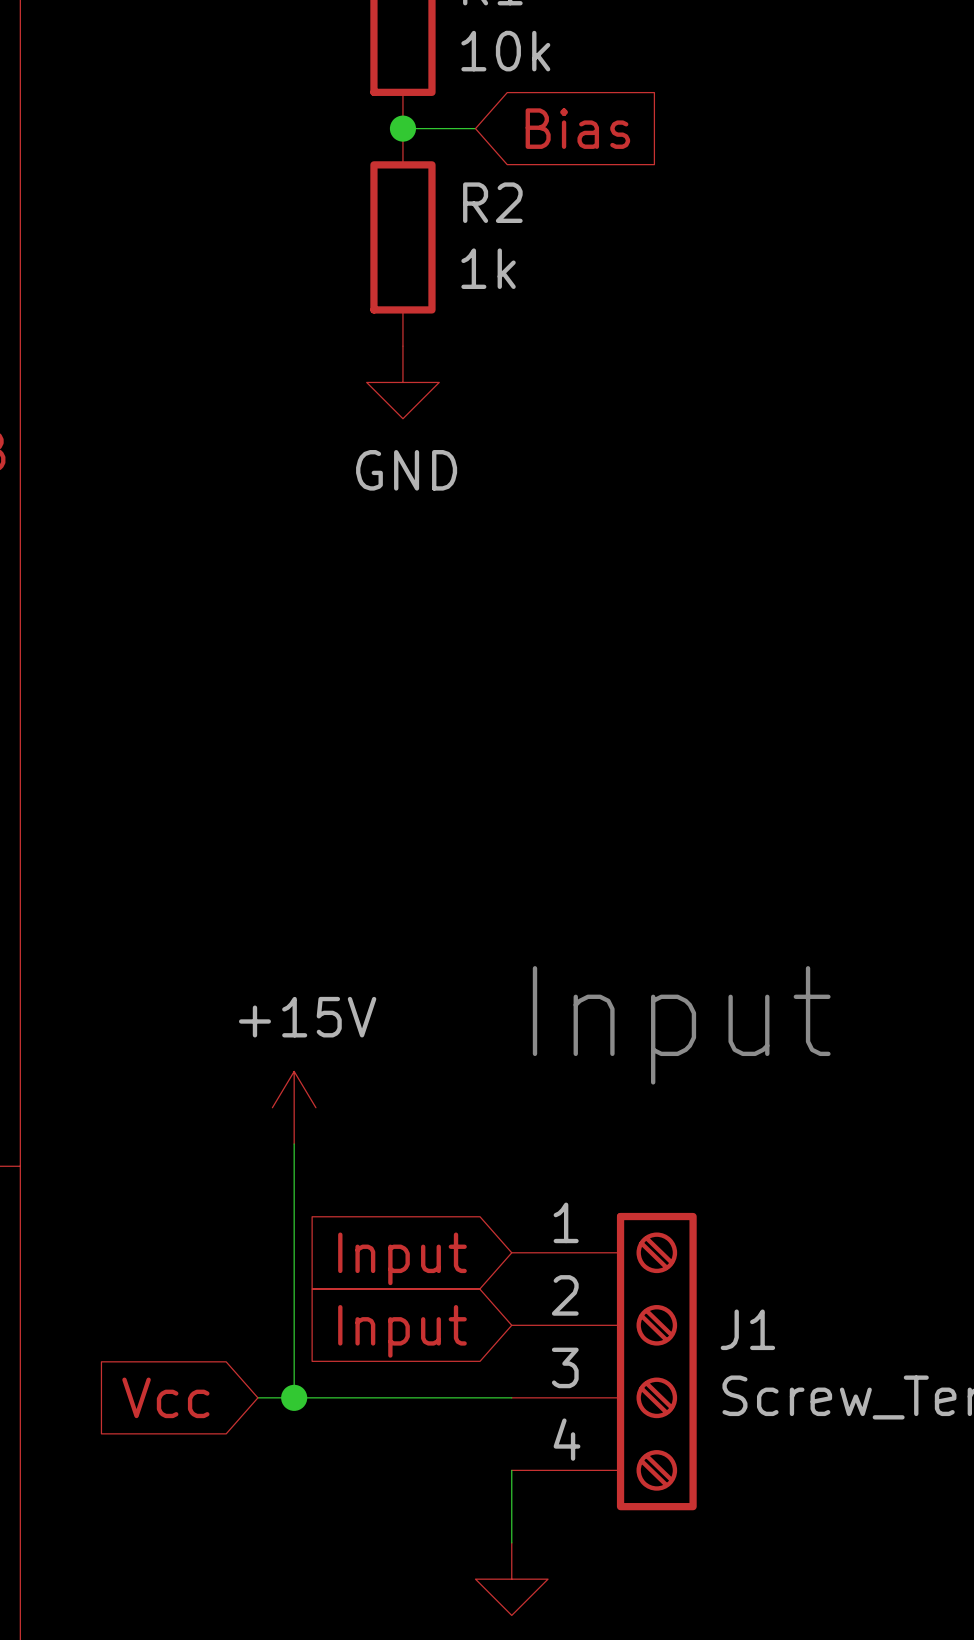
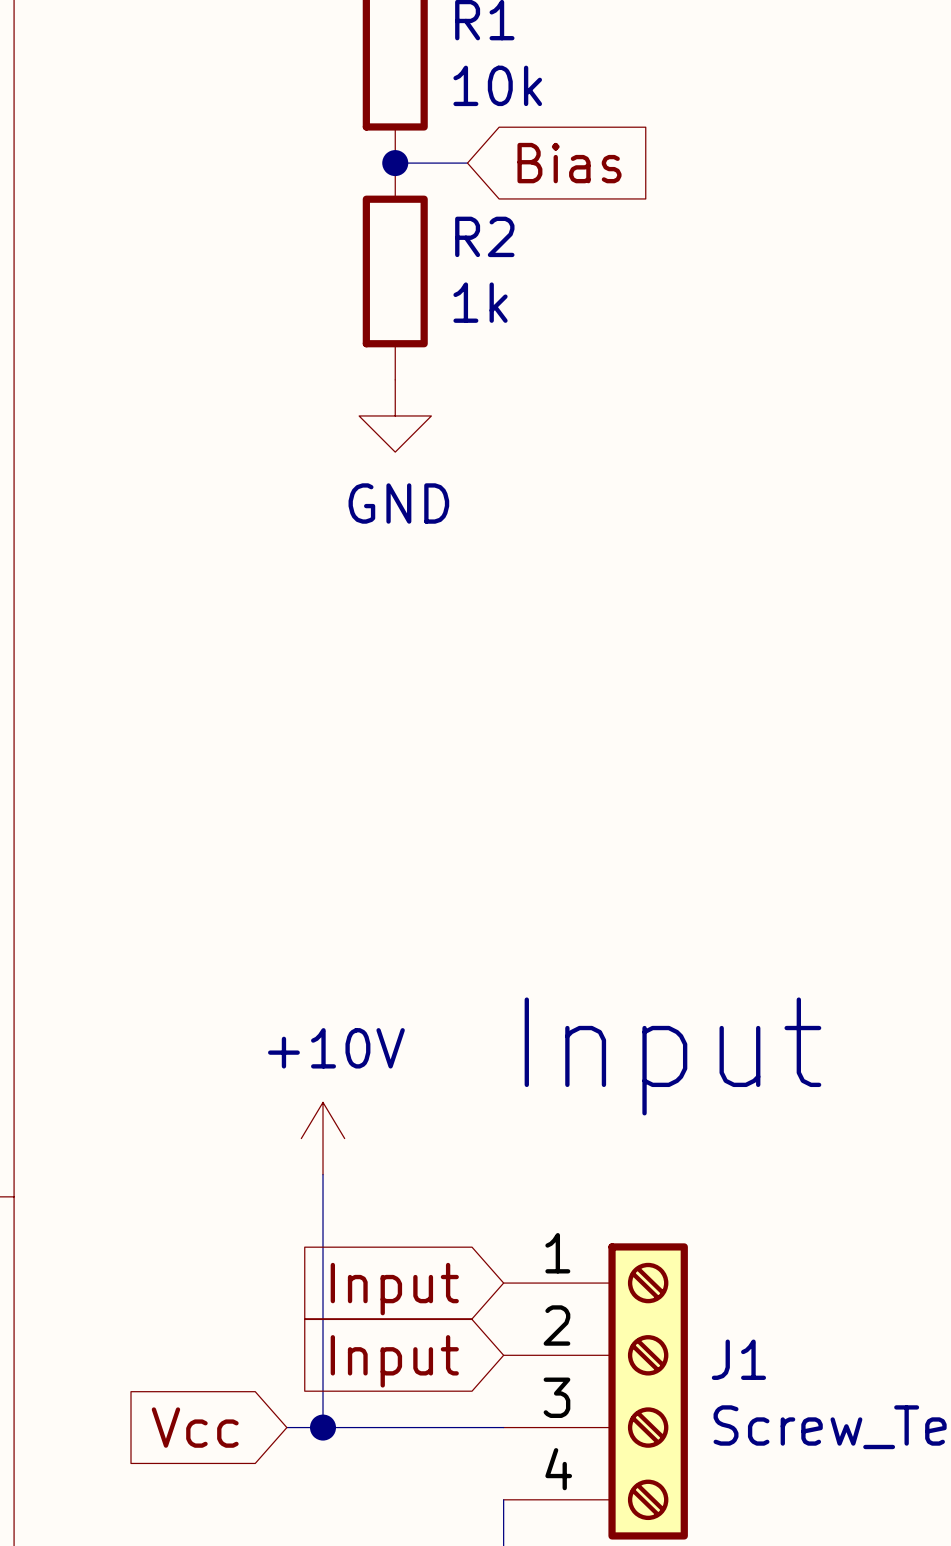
power symbol: +15V (294, 1107) -> none
power symbol: none -> +10V (323, 1138)
wire: (294, 1144) (294, 1397) (257, 1397) -> none
wire: none -> (323, 1174) (323, 1427)
global label position: Vcc (165, 1397) -> Vcc (195, 1427)
junction position: (294, 1397) -> (323, 1427)

